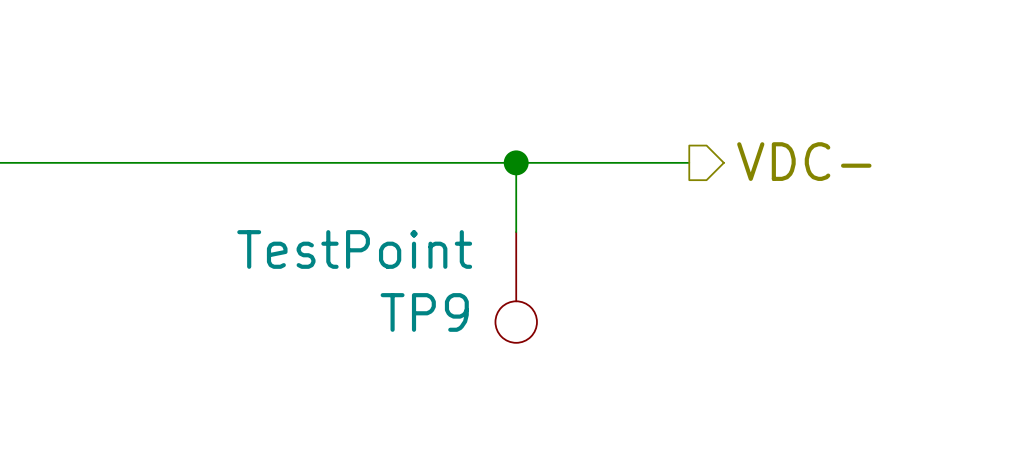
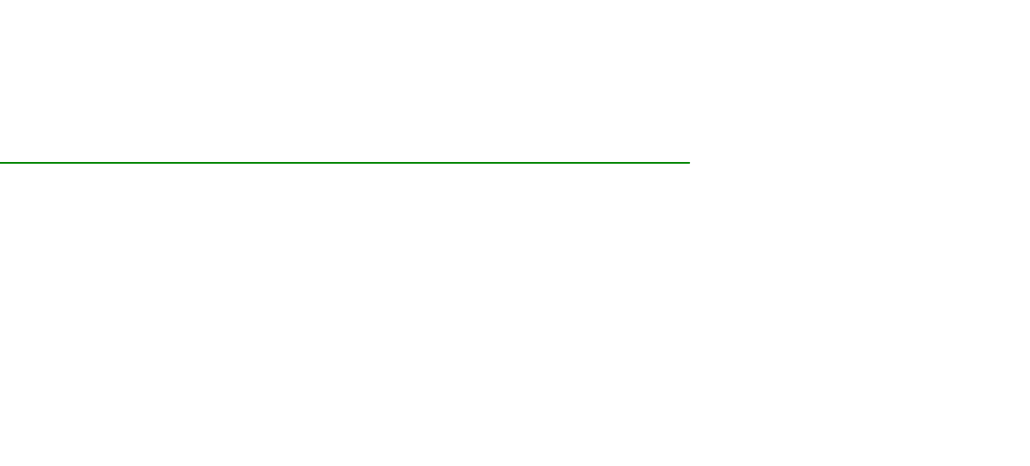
hierarchical label: VDC- (804, 161) -> none
wire: (516, 162) (516, 232) -> none
junction: (516, 162) -> none
TP9: TestPoint (516, 287) -> none

